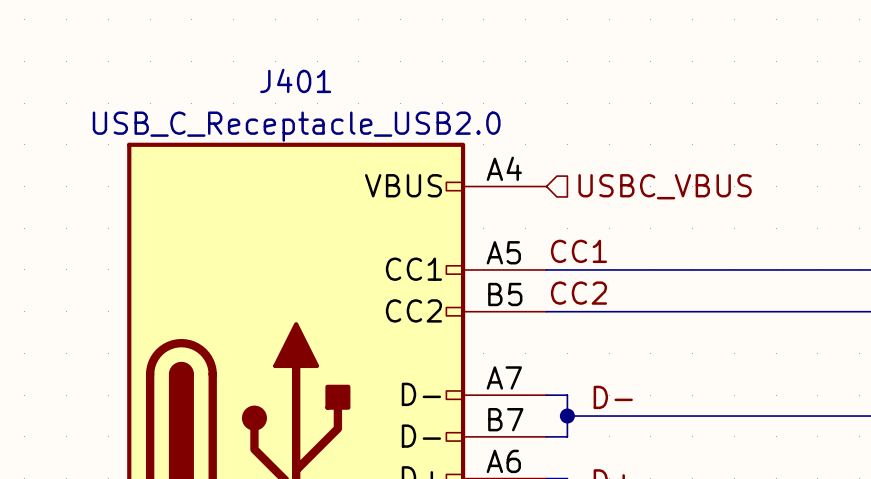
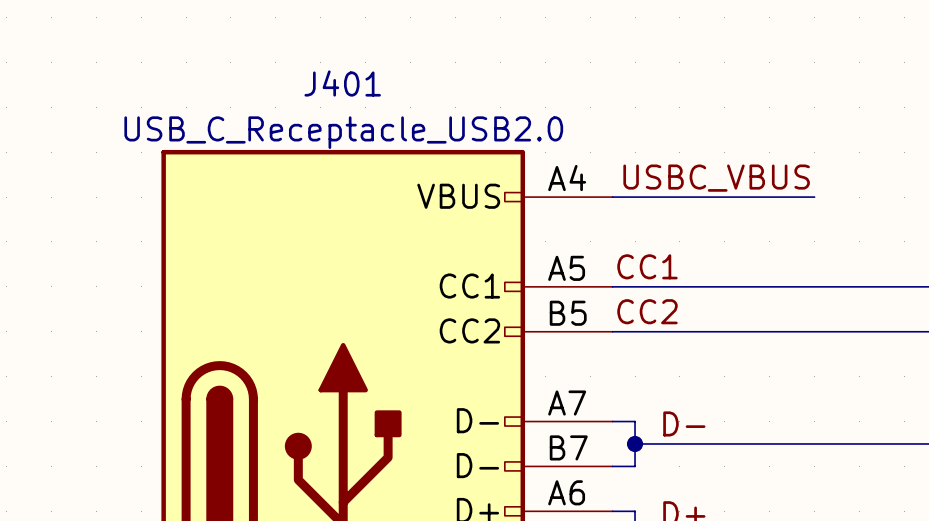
label: none -> USBC_VBUS (716, 178)
wire: none -> (612, 197) (814, 197)
hierarchical label: USBC_VBUS (665, 186) -> none

